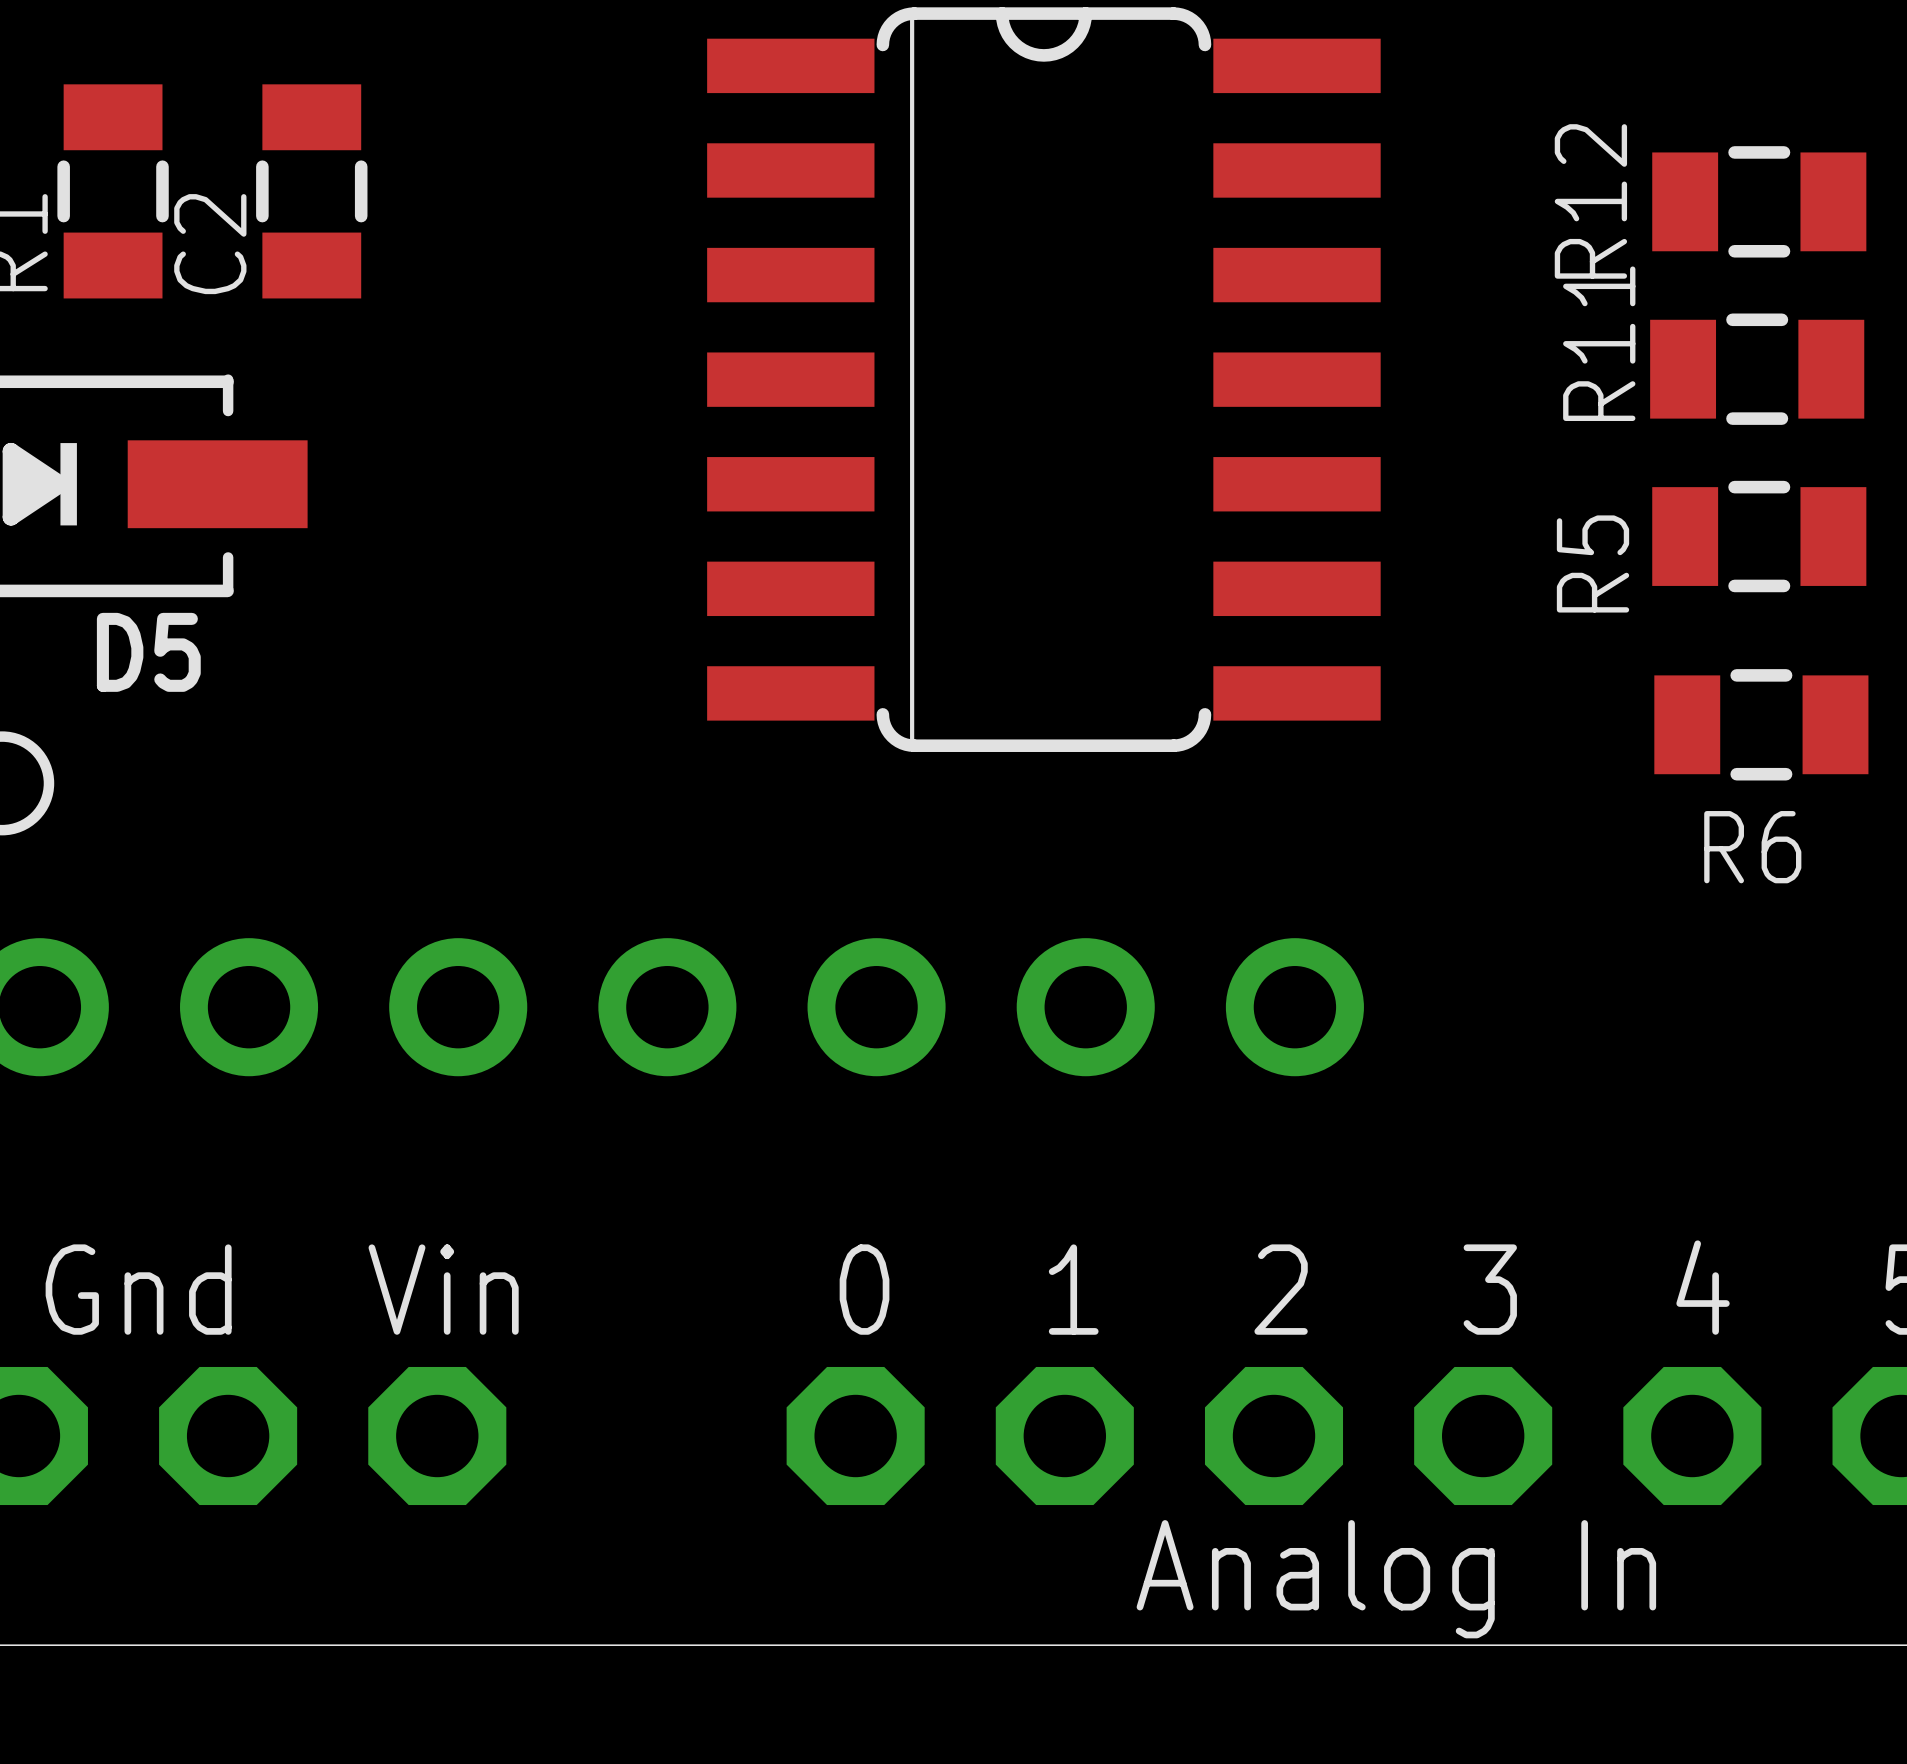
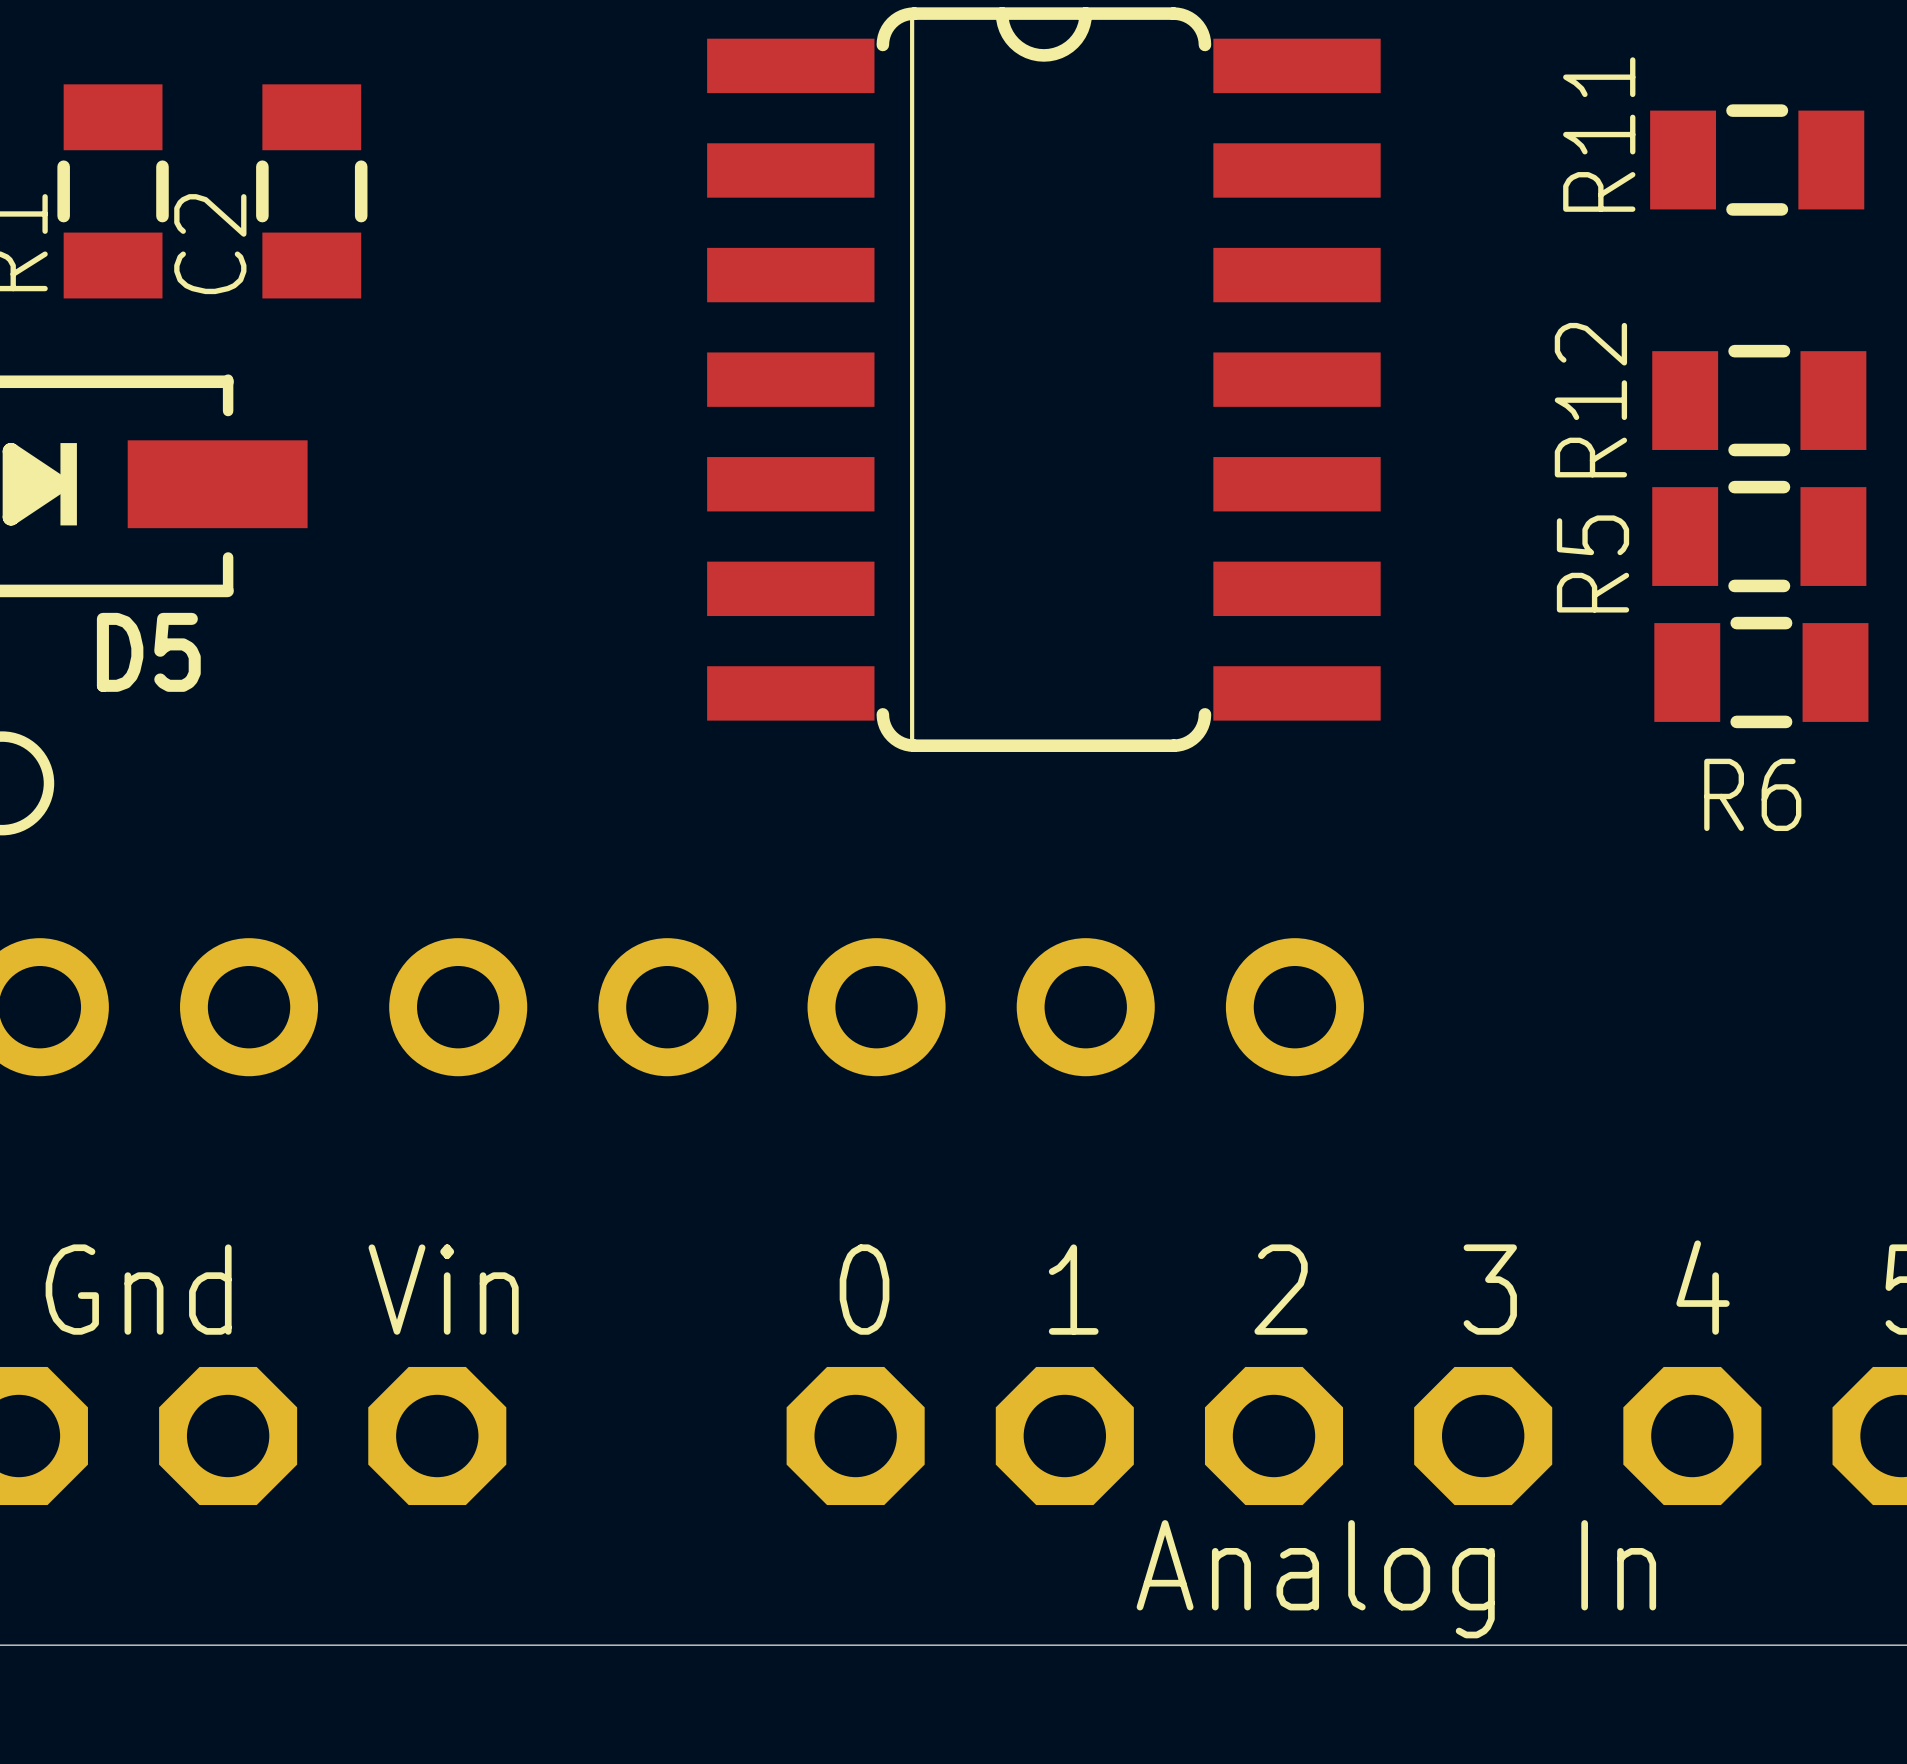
R12 position: (1759, 201) -> (1759, 400)
R11 position: (1757, 369) -> (1757, 160)
R6 position: (1761, 724) -> (1761, 672)

